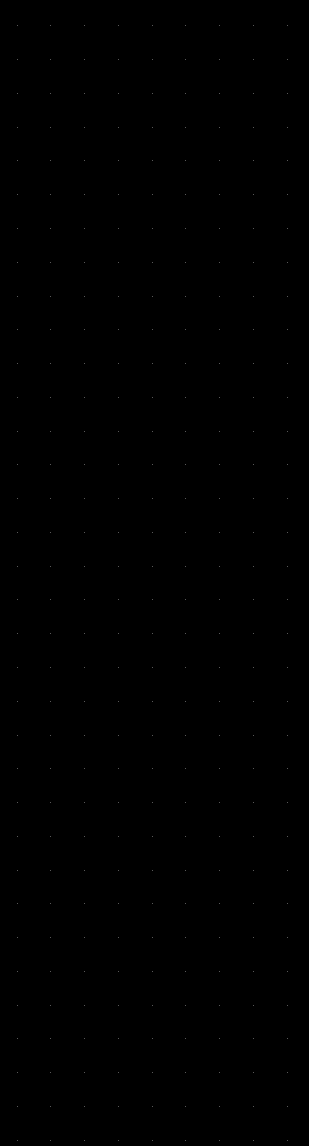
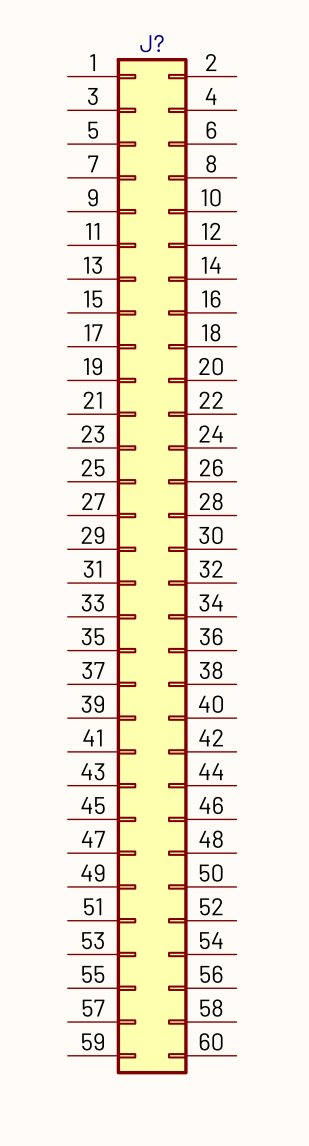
J?: none -> (152, 566)

